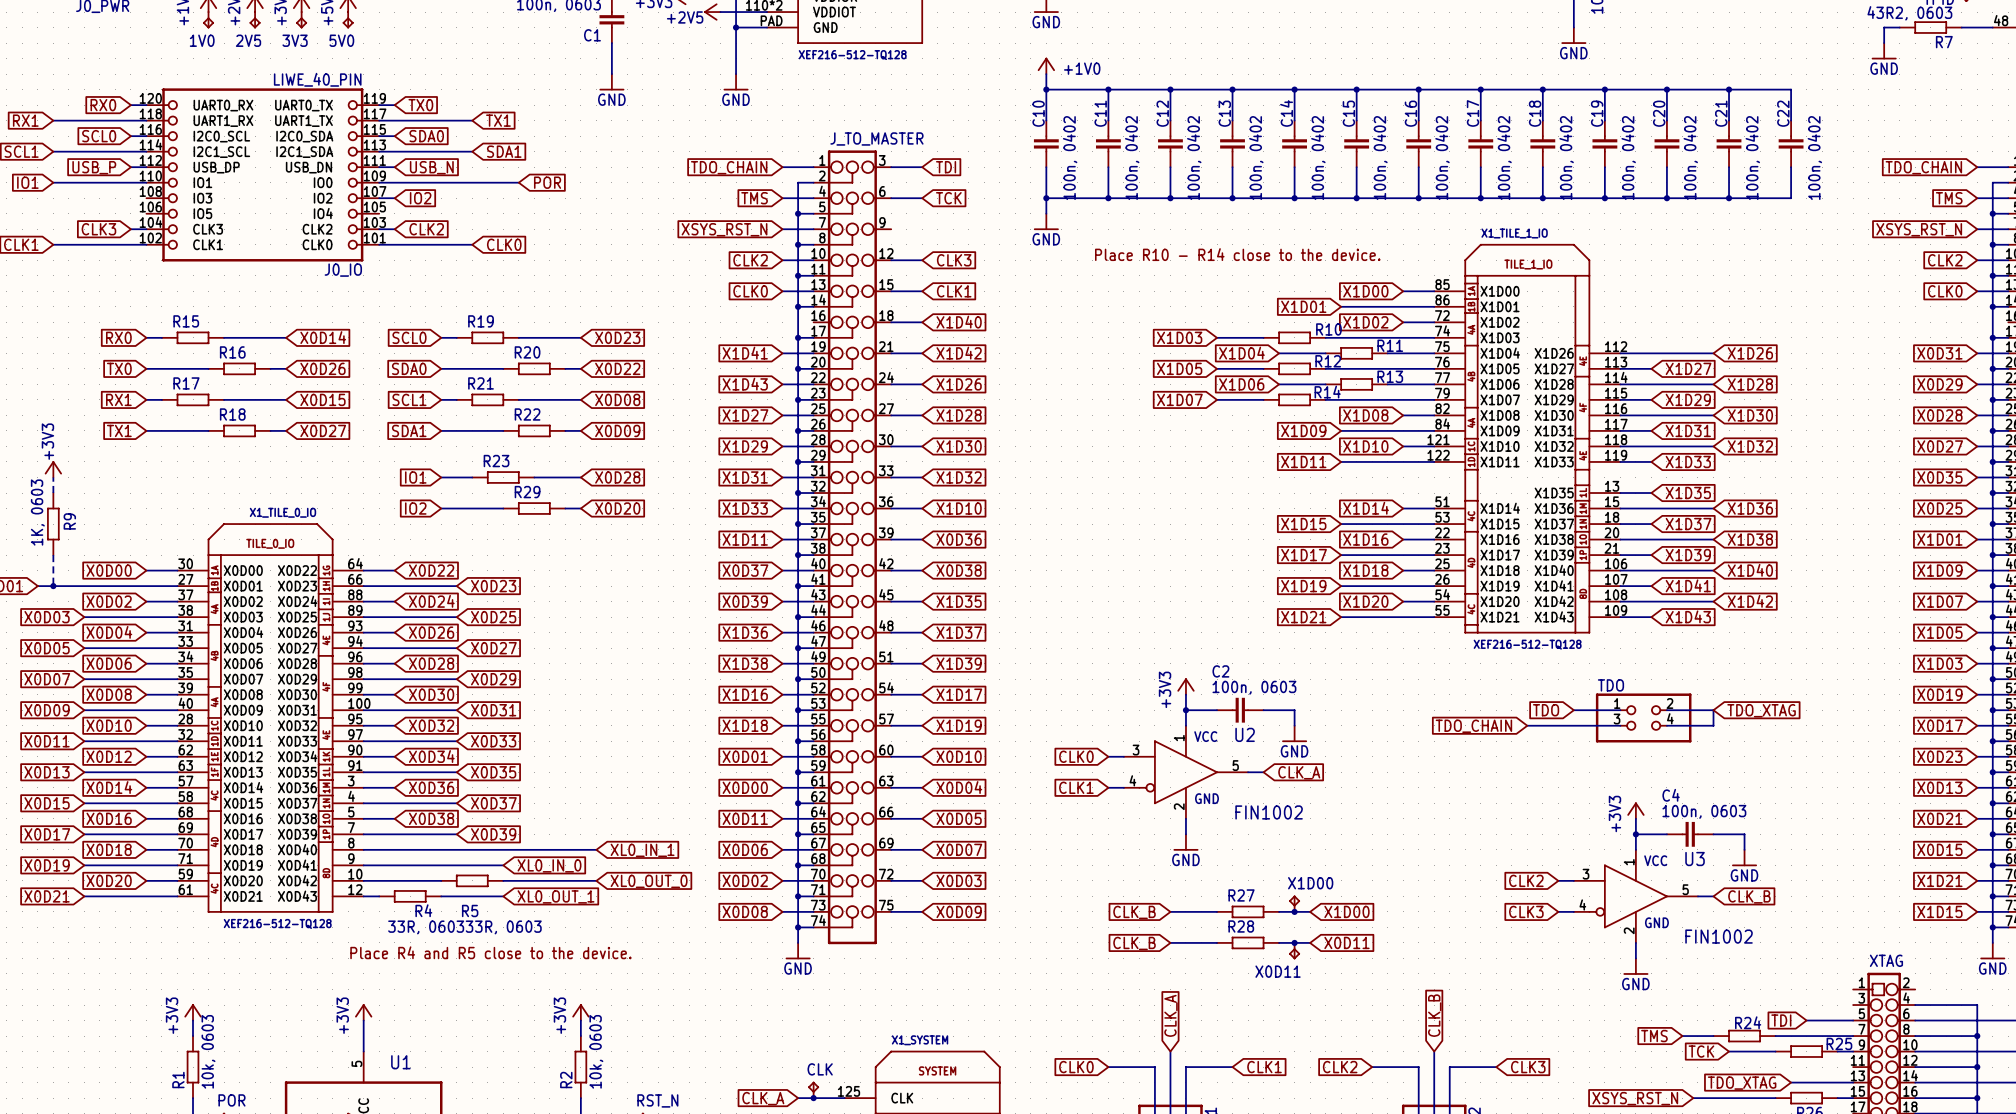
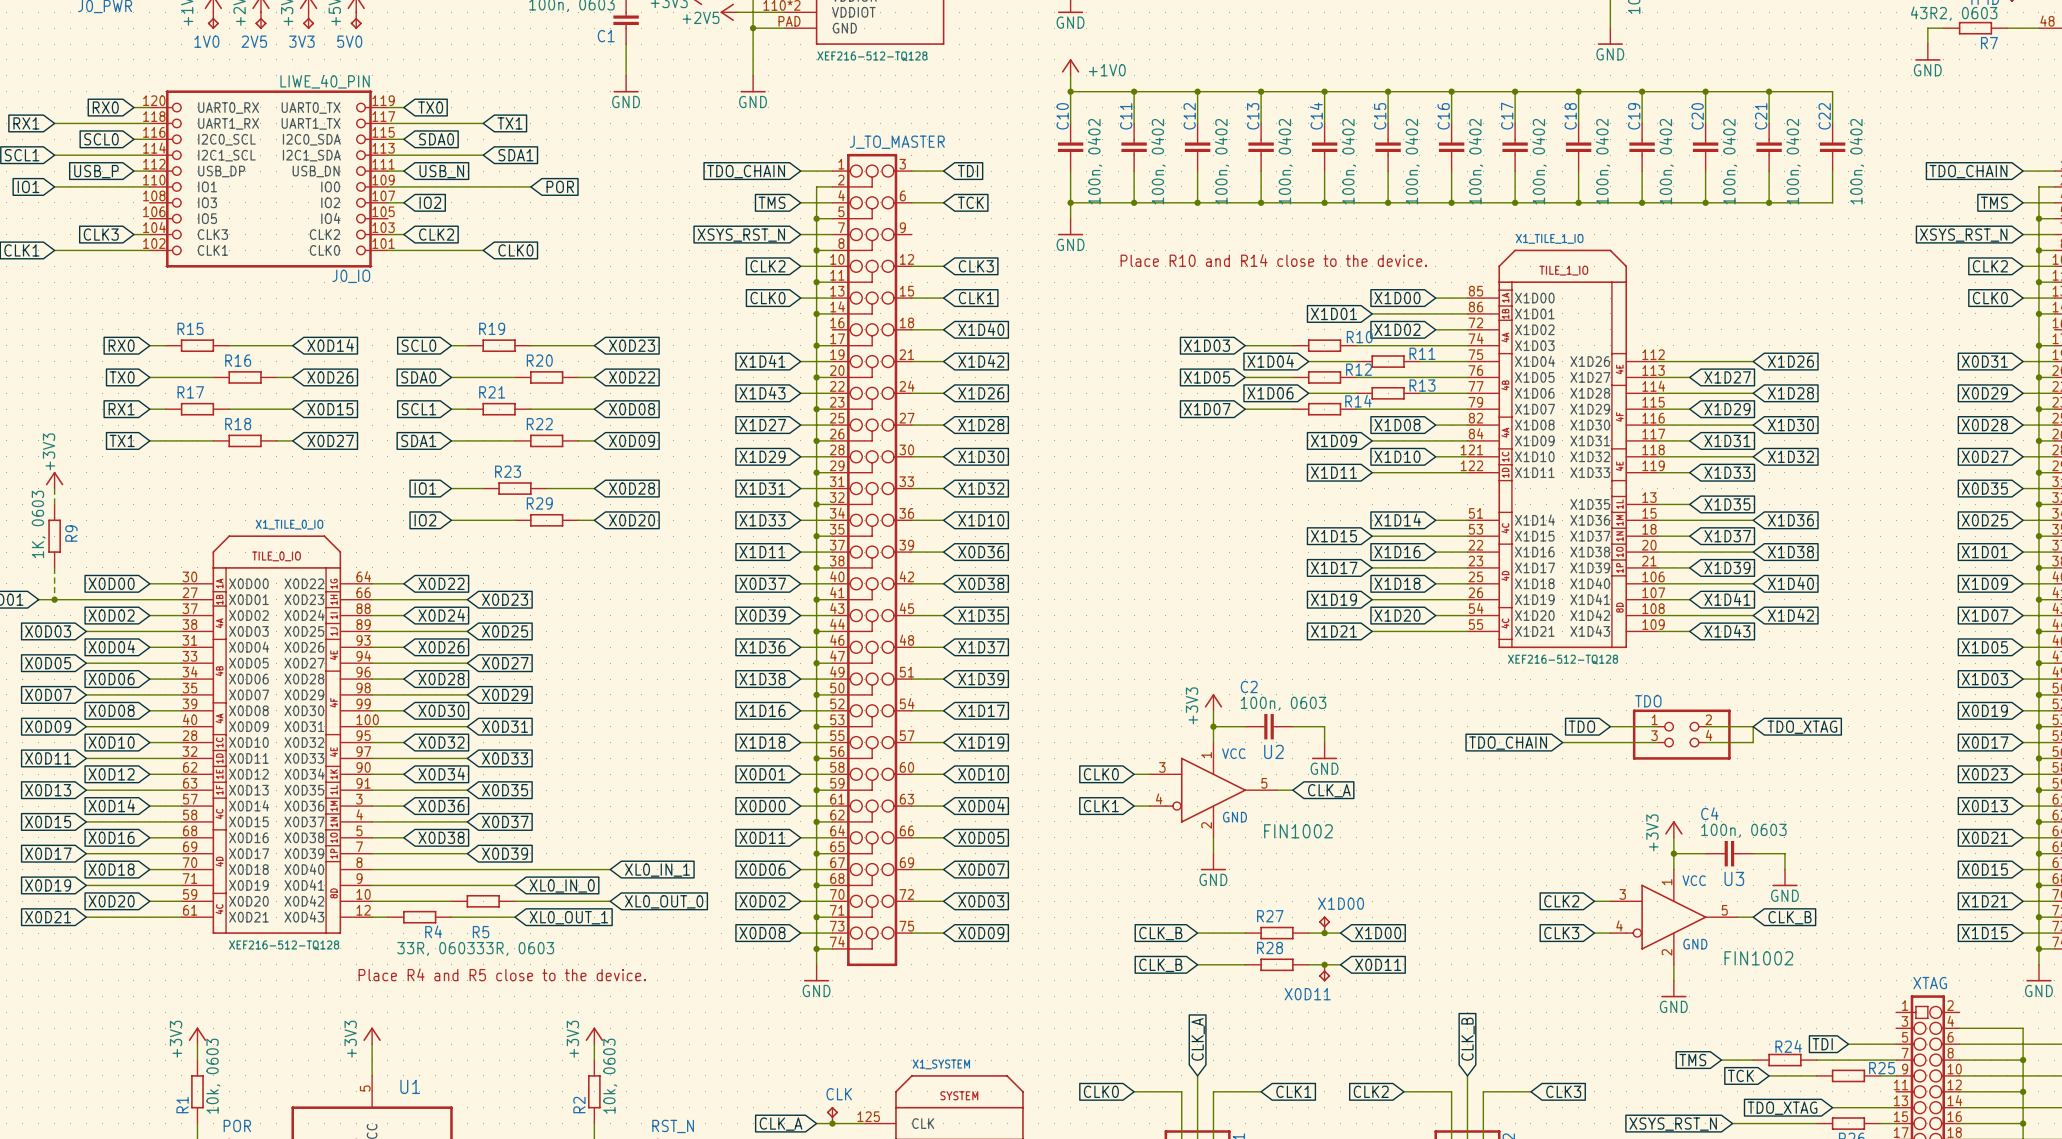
text: Place R10 - R14 close to the device. (1237, 254) -> Place R10 and R14 close to the device. (1273, 260)

